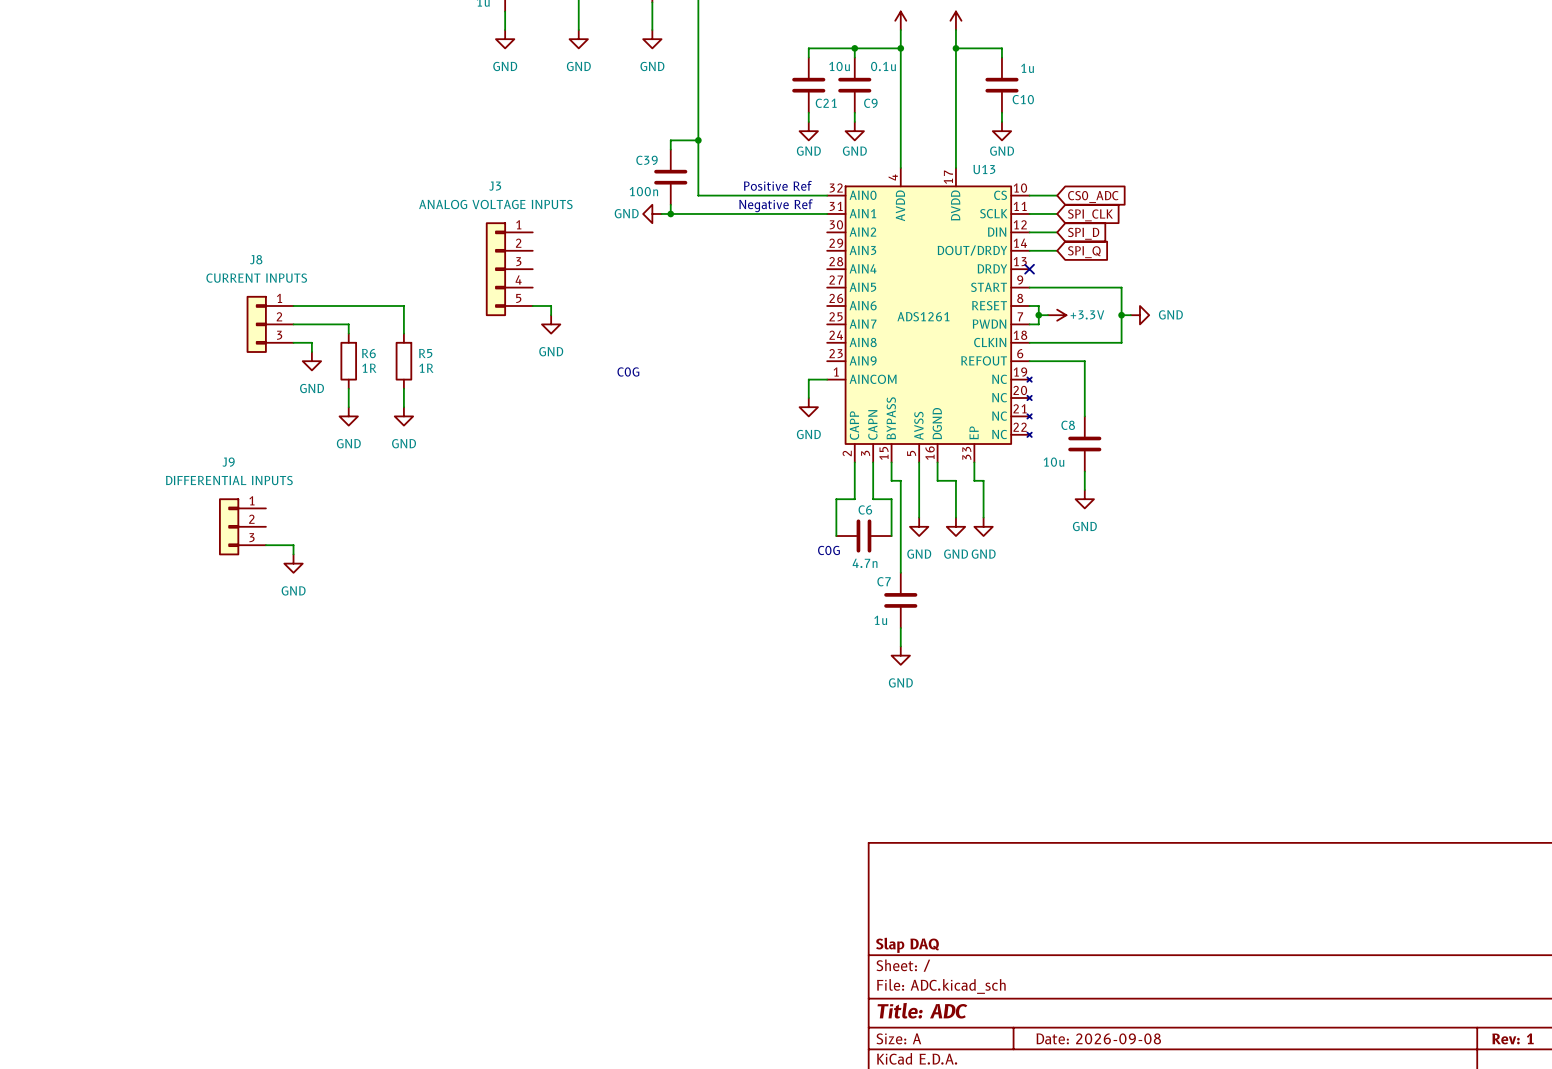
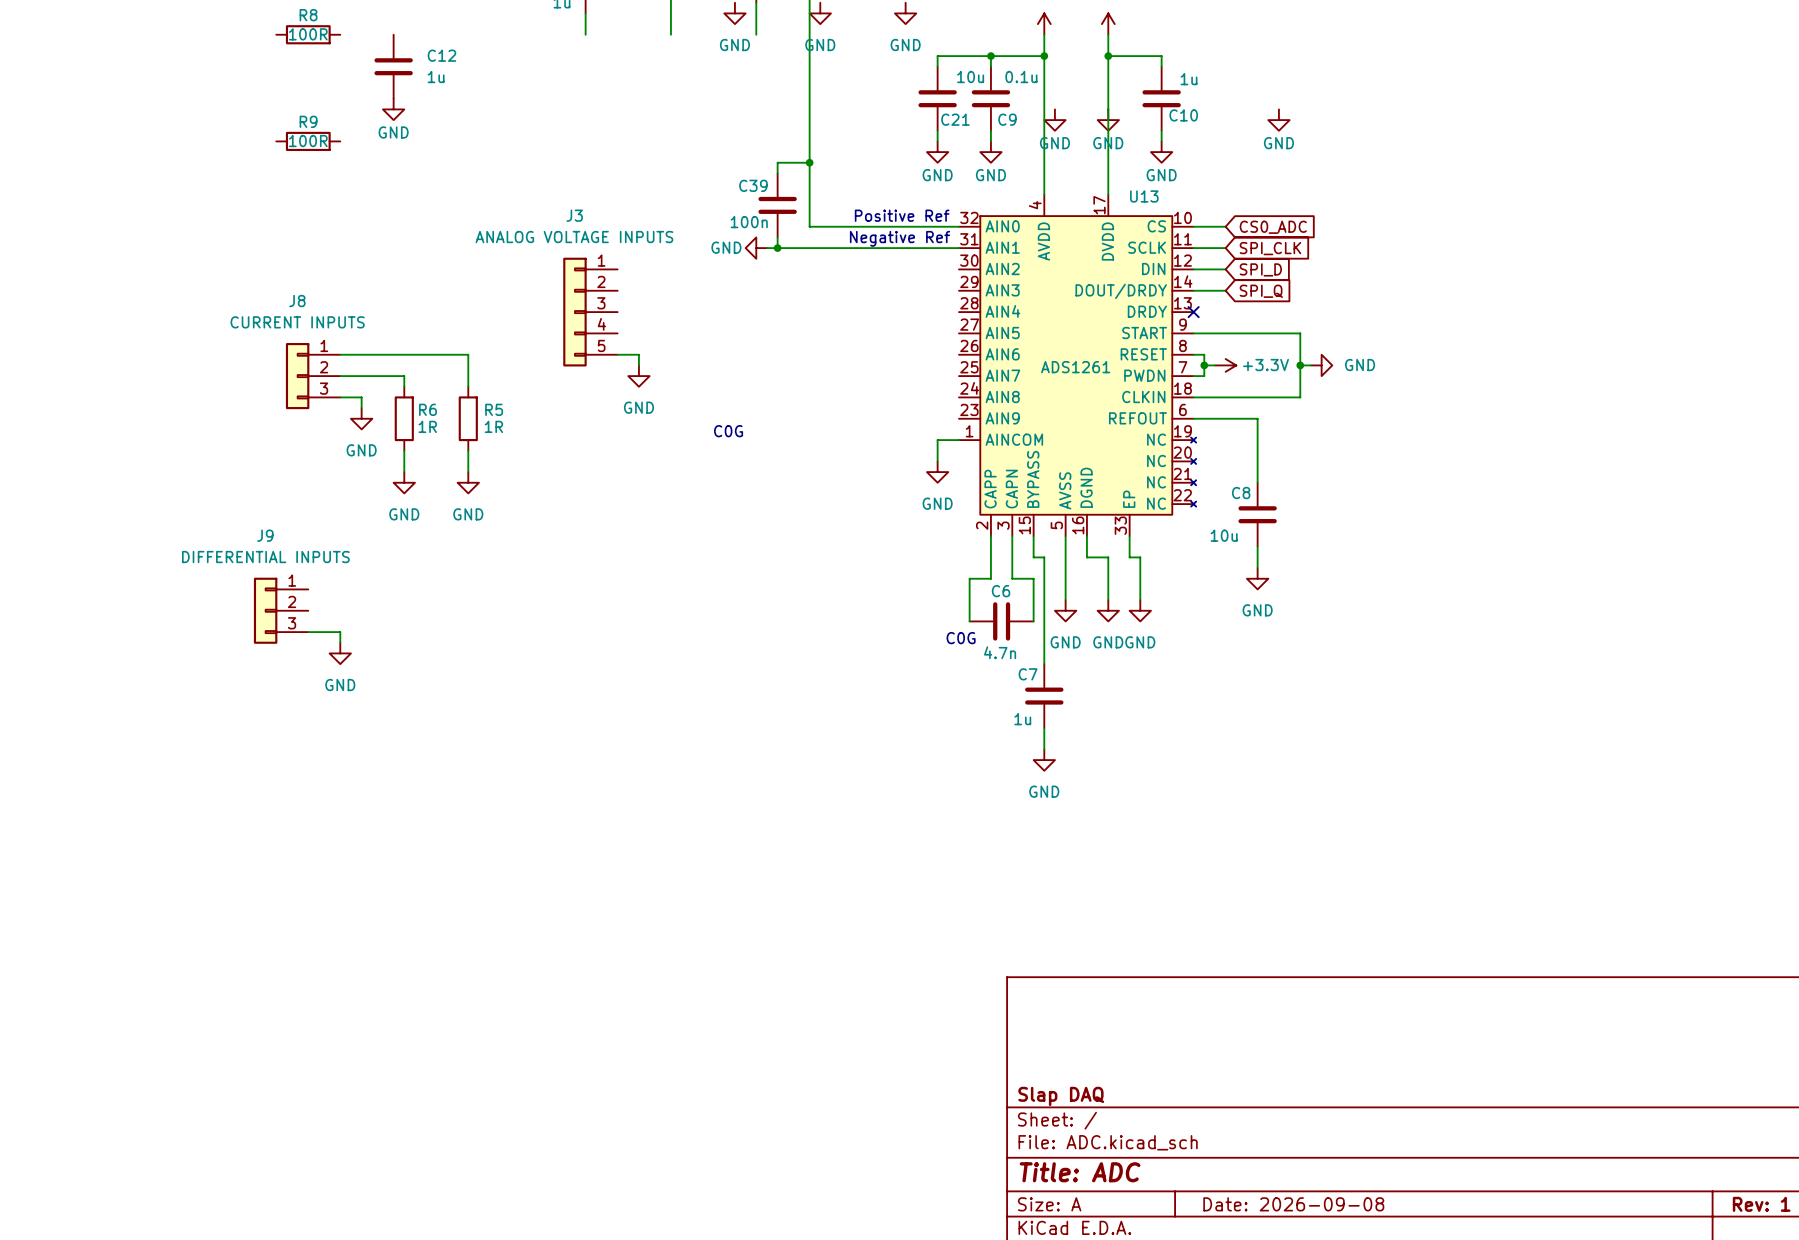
power symbol: none -> GND (734, 13)
power symbol: none -> GND (820, 13)
power symbol: none -> GND (905, 13)
R8: none -> 100R (308, 34)
power symbol: GND (505, 39) -> none
power symbol: GND (578, 39) -> none
power symbol: GND (652, 39) -> none
C12: none -> 1u (393, 66)
power symbol: none -> GND (393, 109)
power symbol: none -> GND (1054, 120)
power symbol: none -> GND (1108, 120)
power symbol: none -> GND (1278, 120)
R9: none -> 100R (308, 141)

